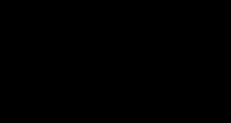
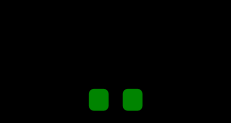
part: none -> (115, 99)

